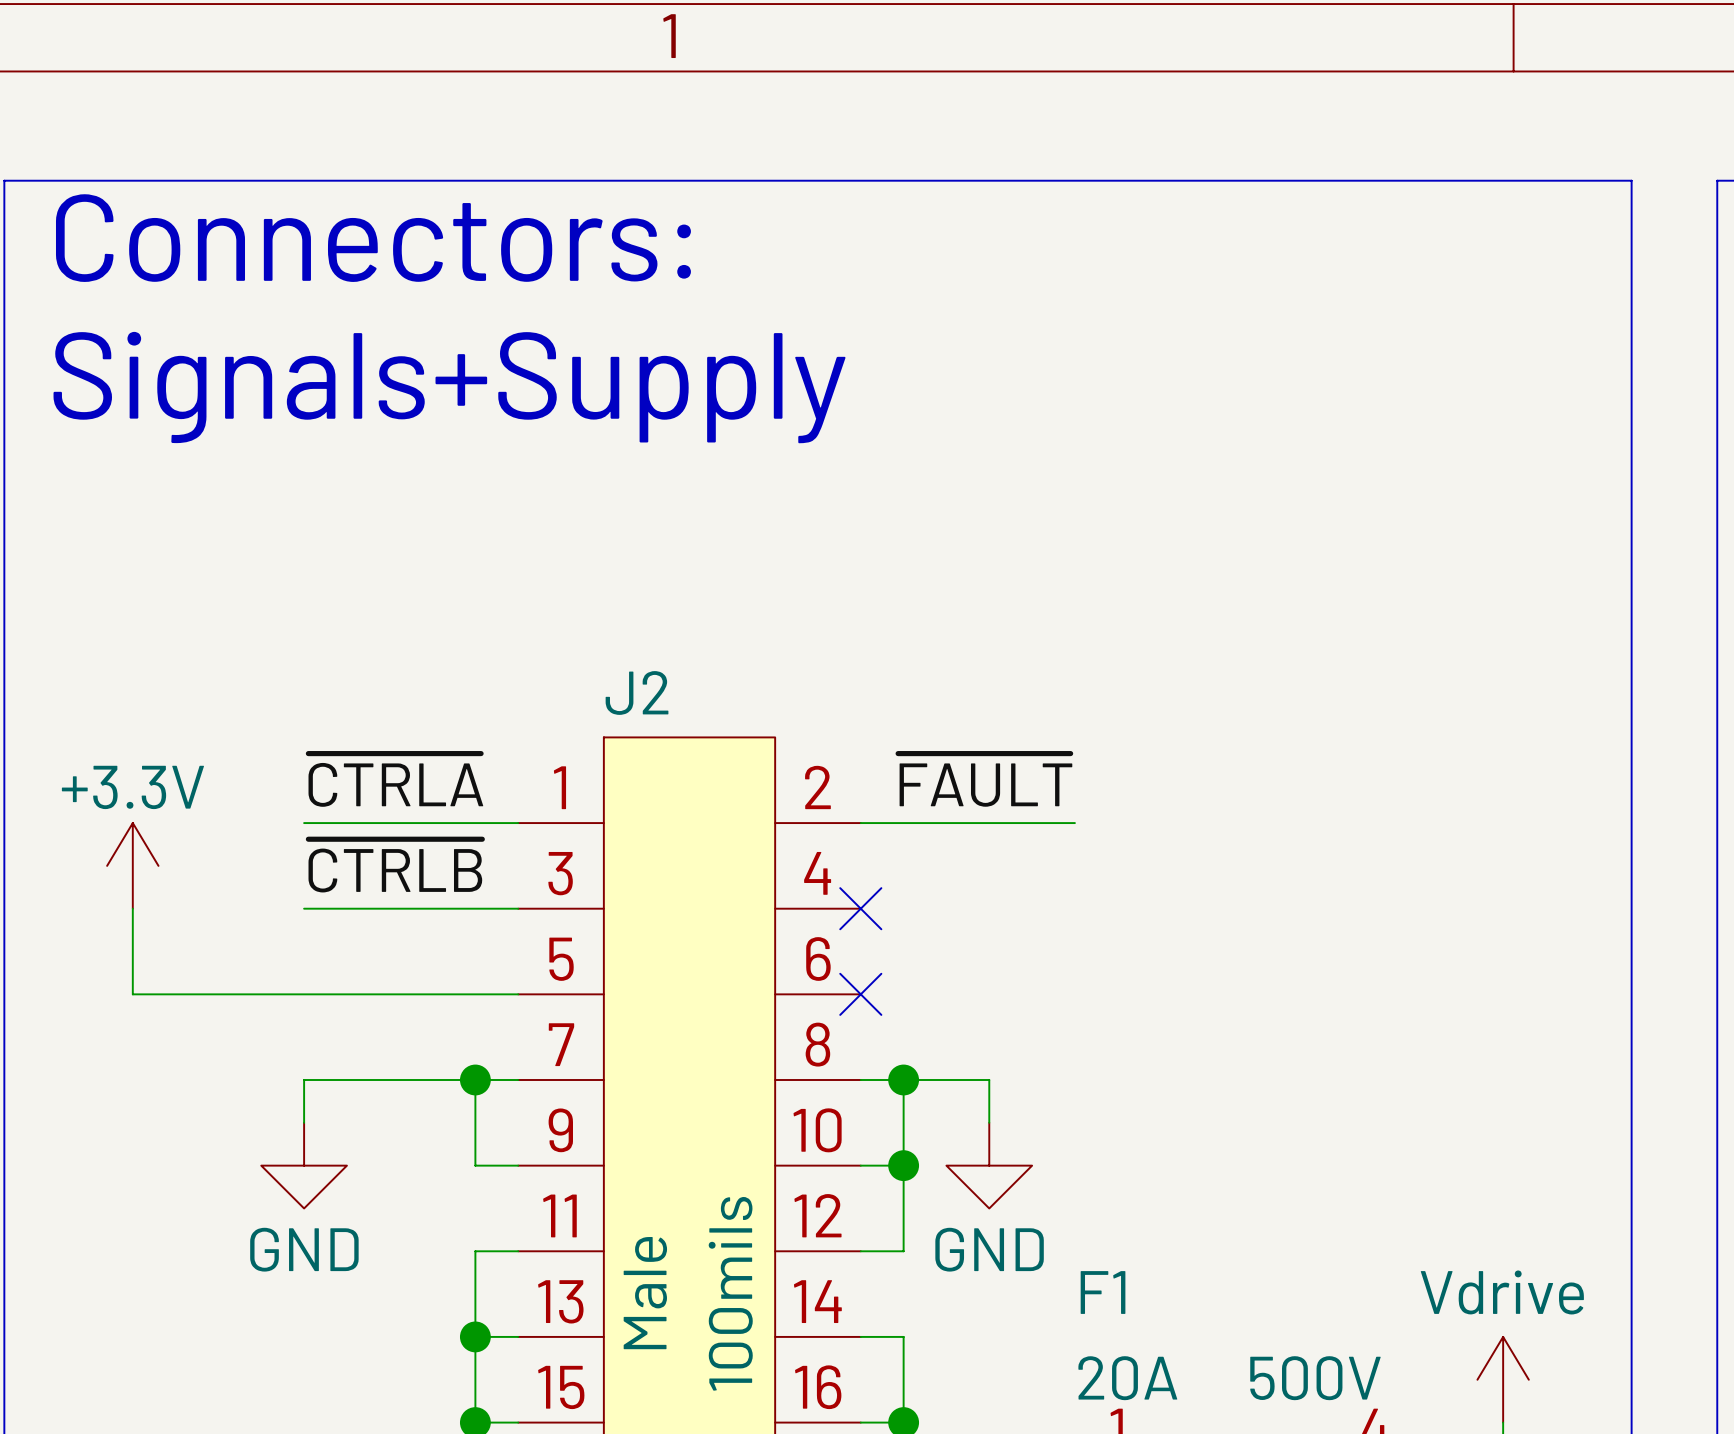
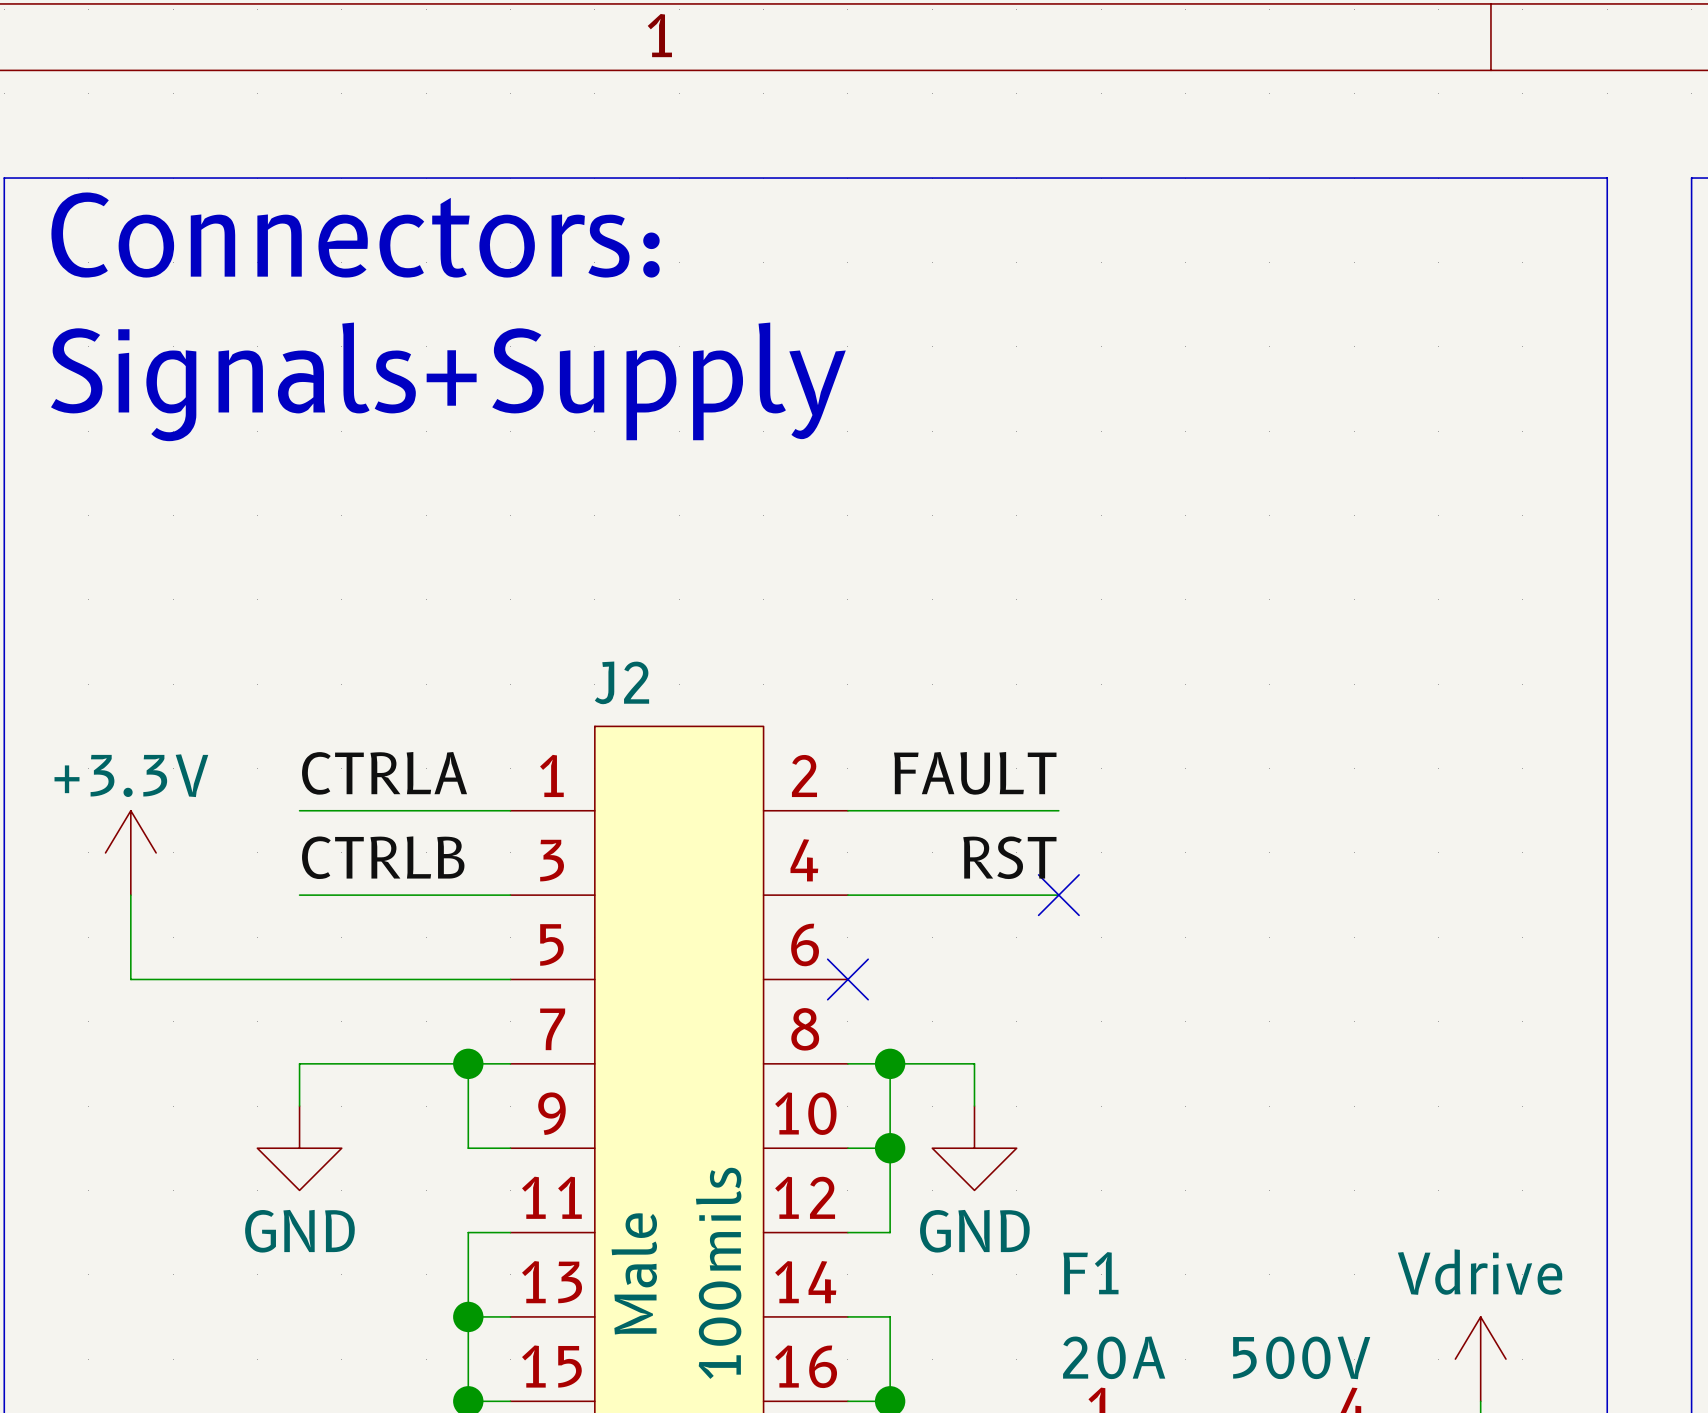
label: ~{CTRLA} (395, 780) -> CTRLA (384, 773)
label: ~{FAULT} (985, 780) -> FAULT (975, 773)
label: ~{CTRLB} (395, 865) -> CTRLB (383, 857)
label: none -> RST (1009, 857)
wire: none -> (847, 895) (1058, 895)
no-connect mark: (860, 908) -> none
no-connect mark: none -> (1058, 895)

